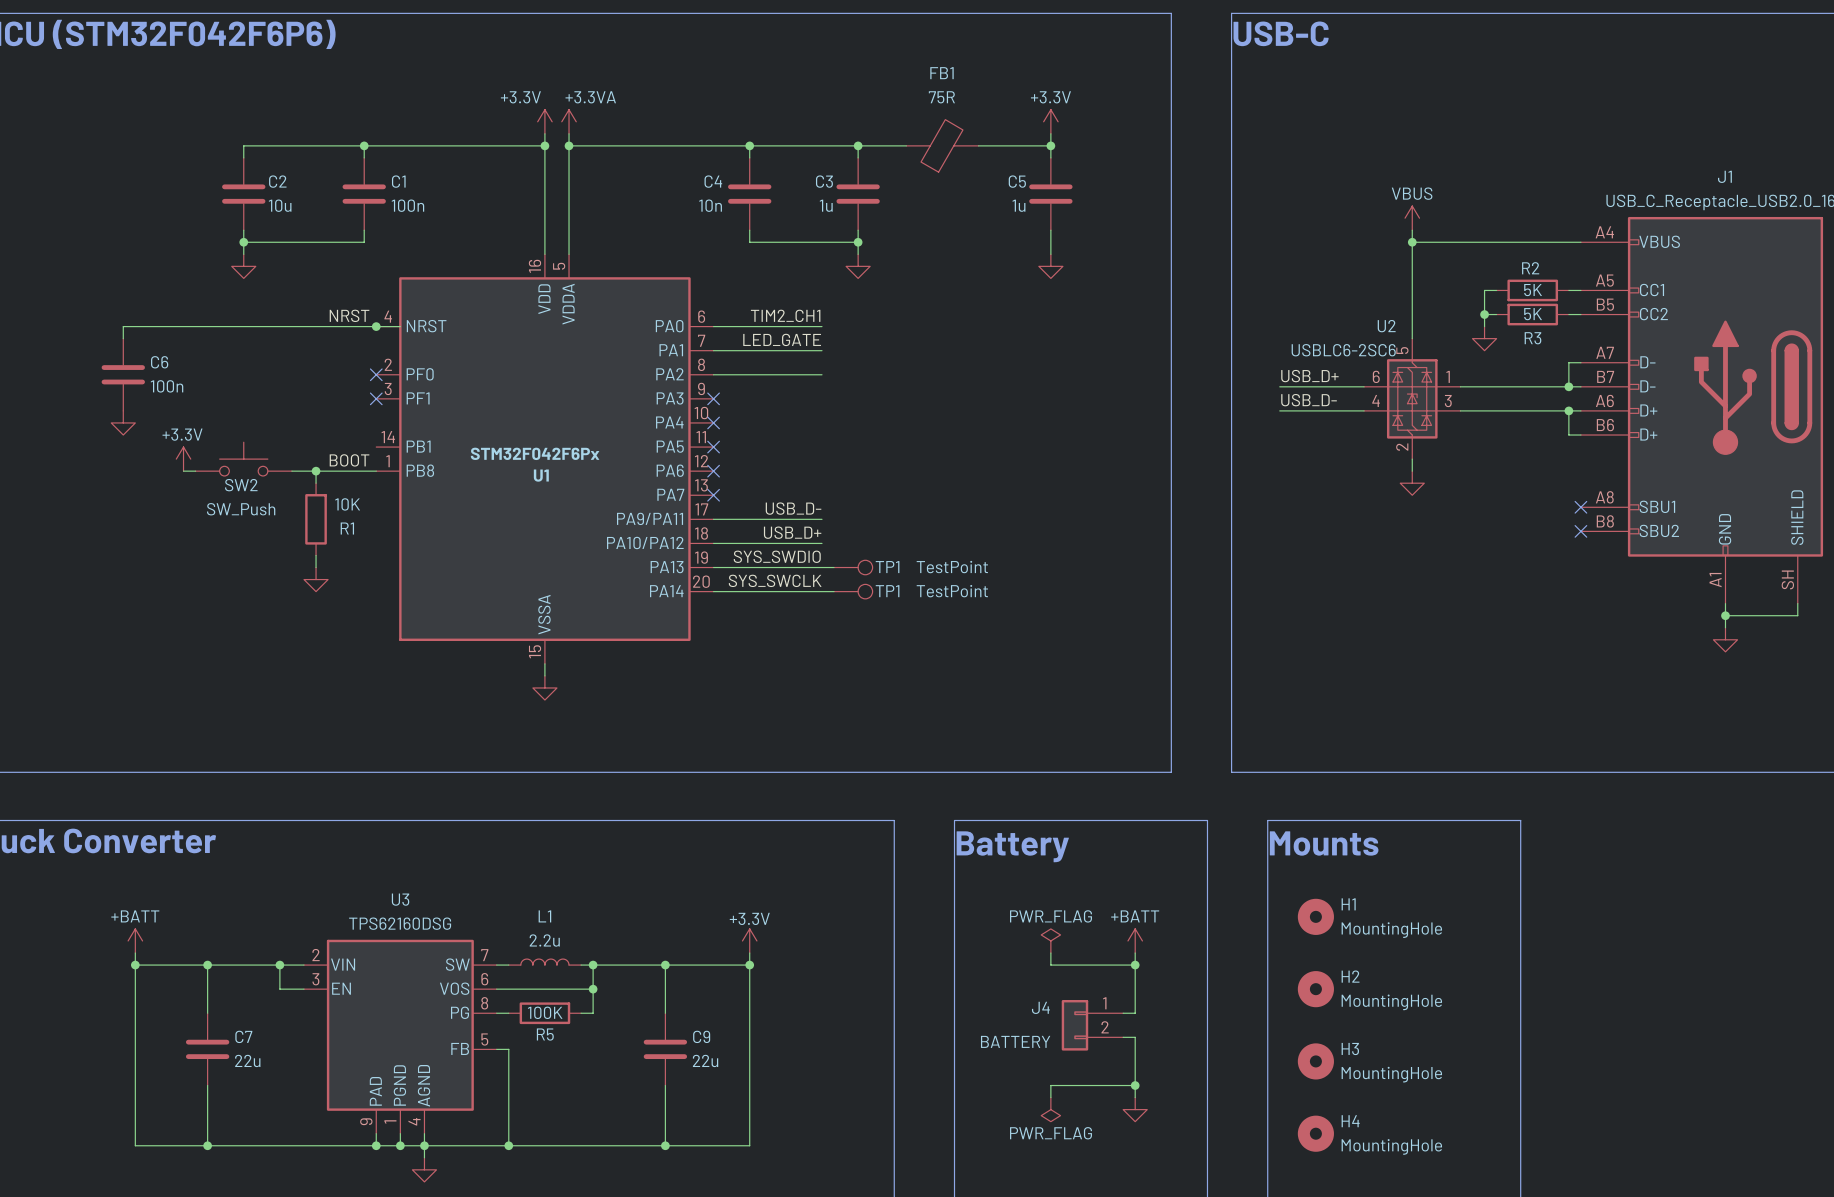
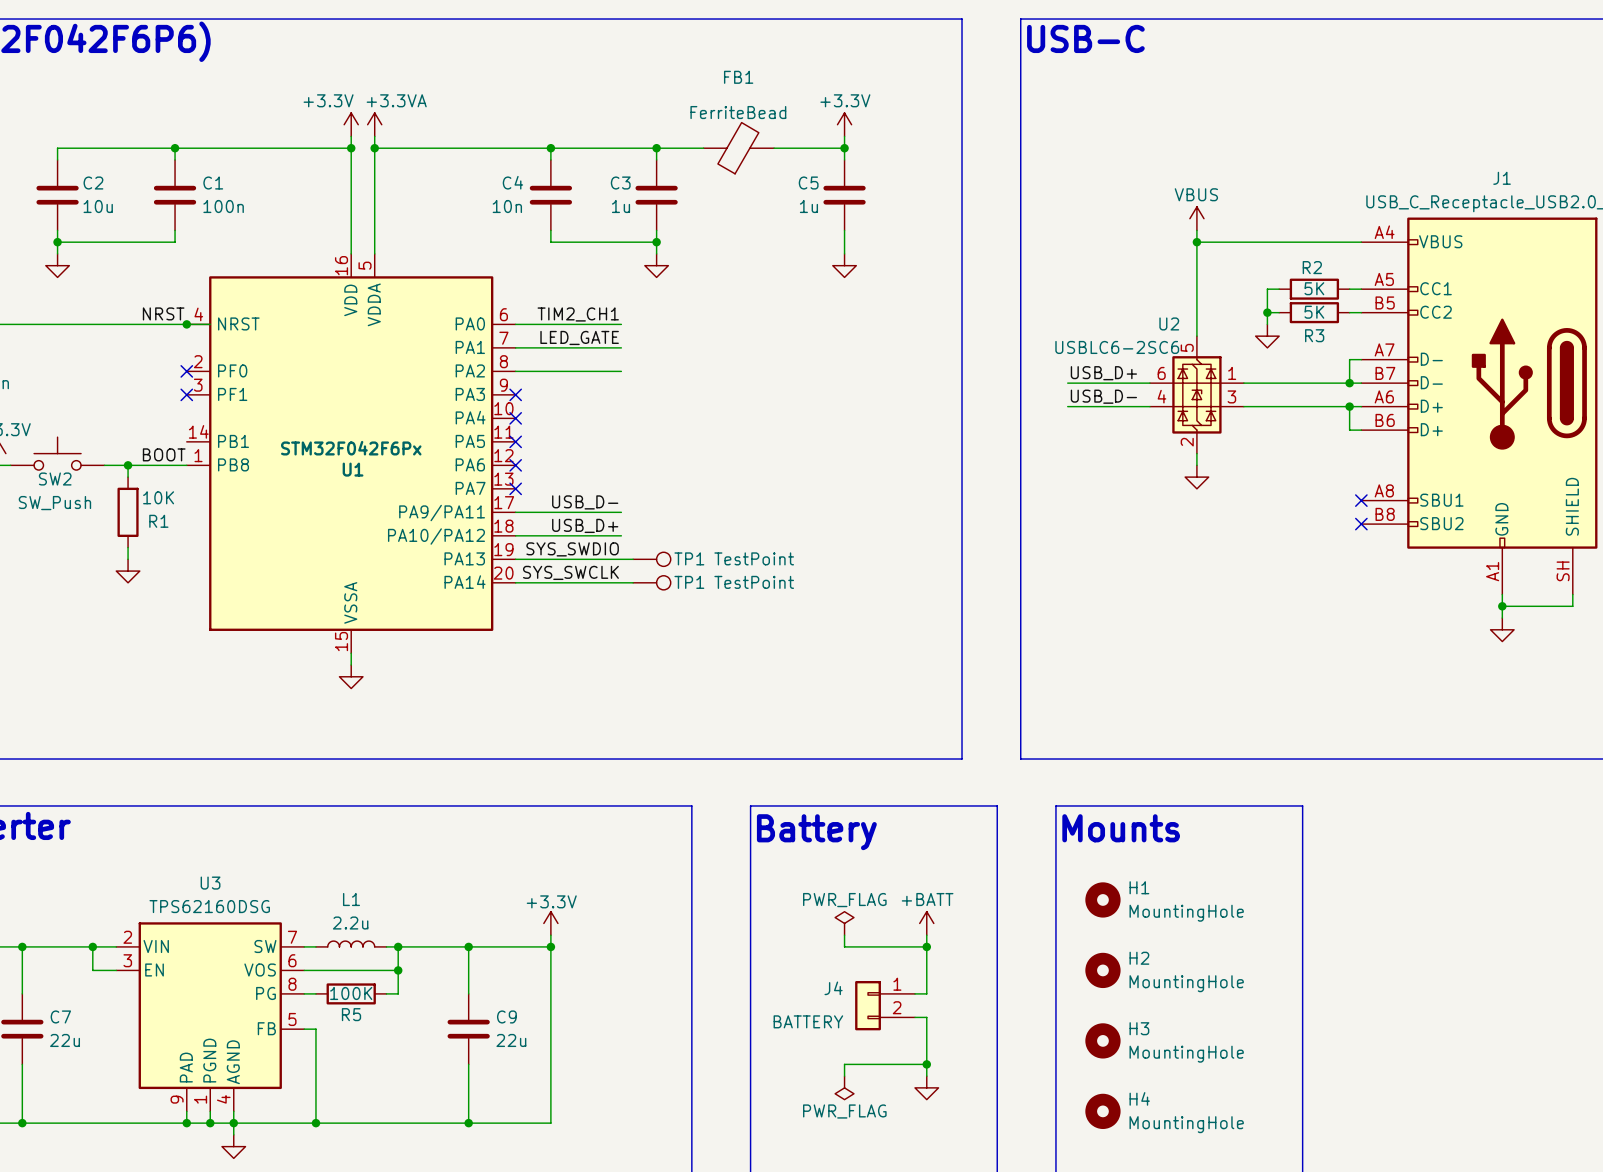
FB1 value: 75R (941, 97) -> FerriteBead (738, 112)

